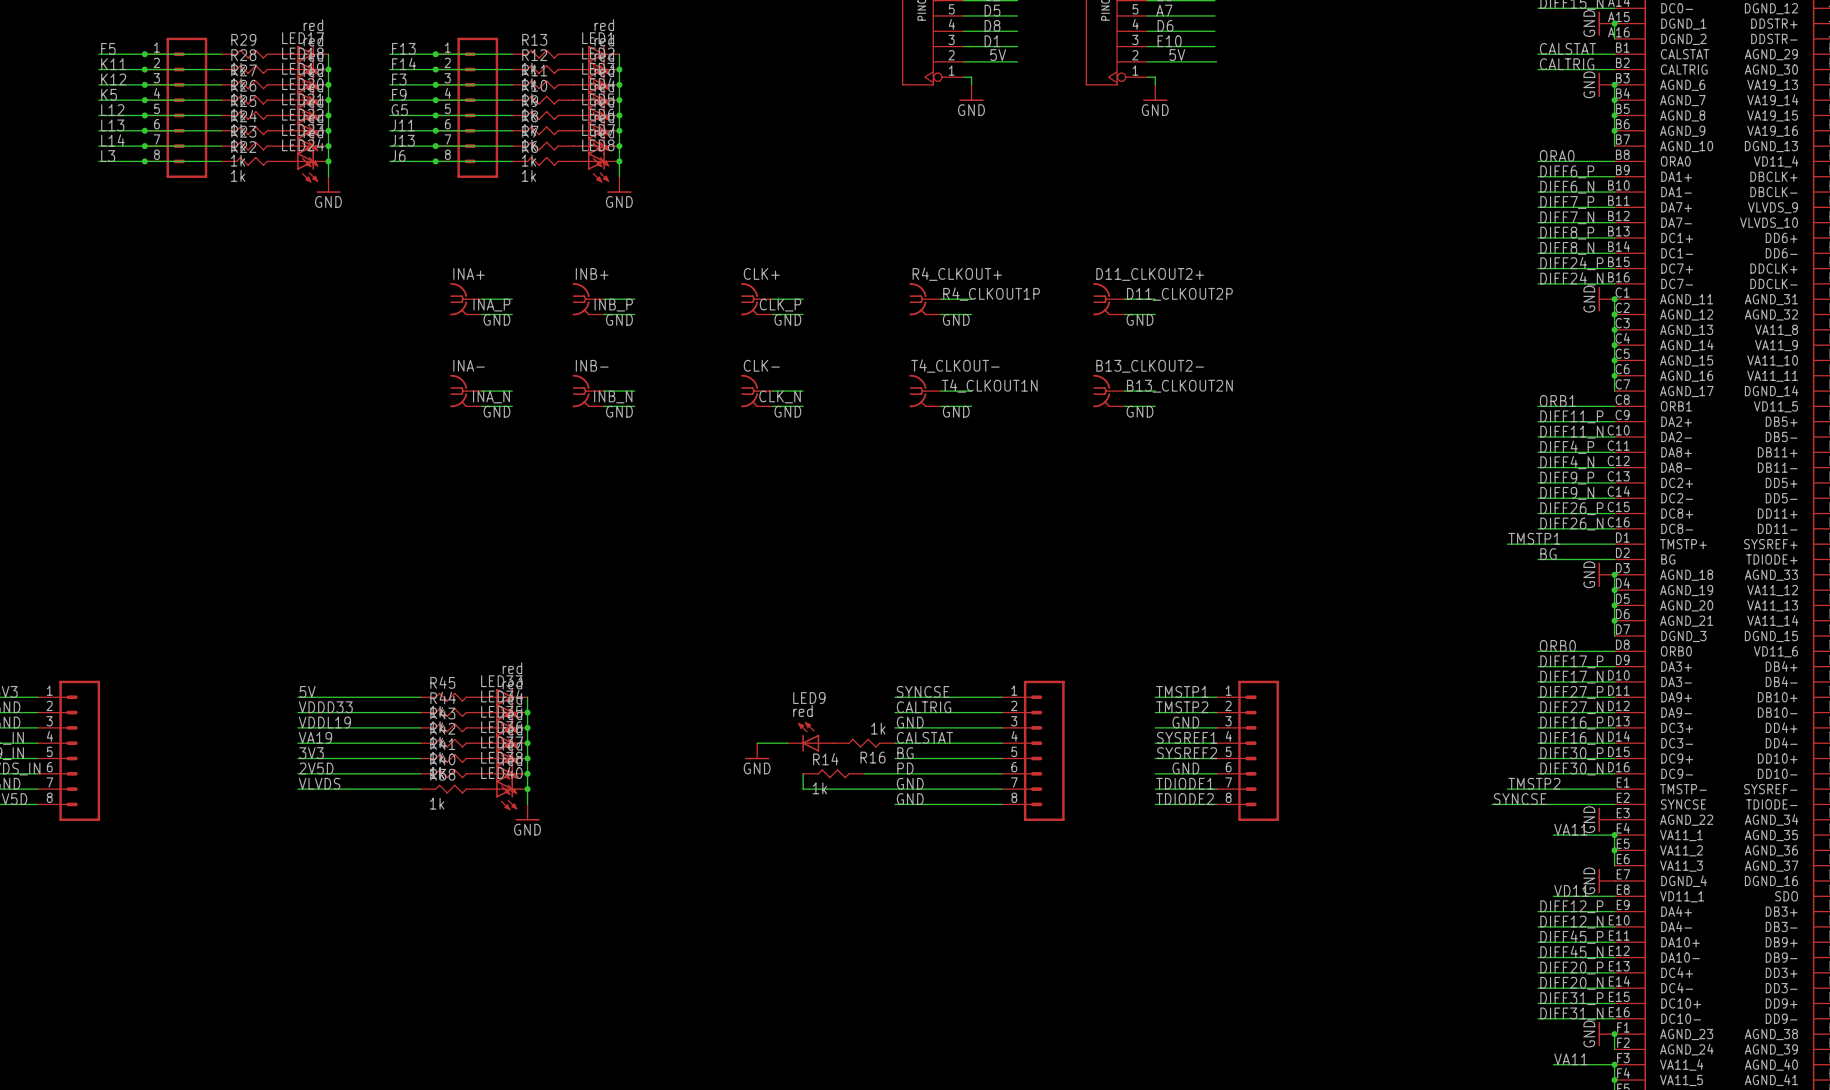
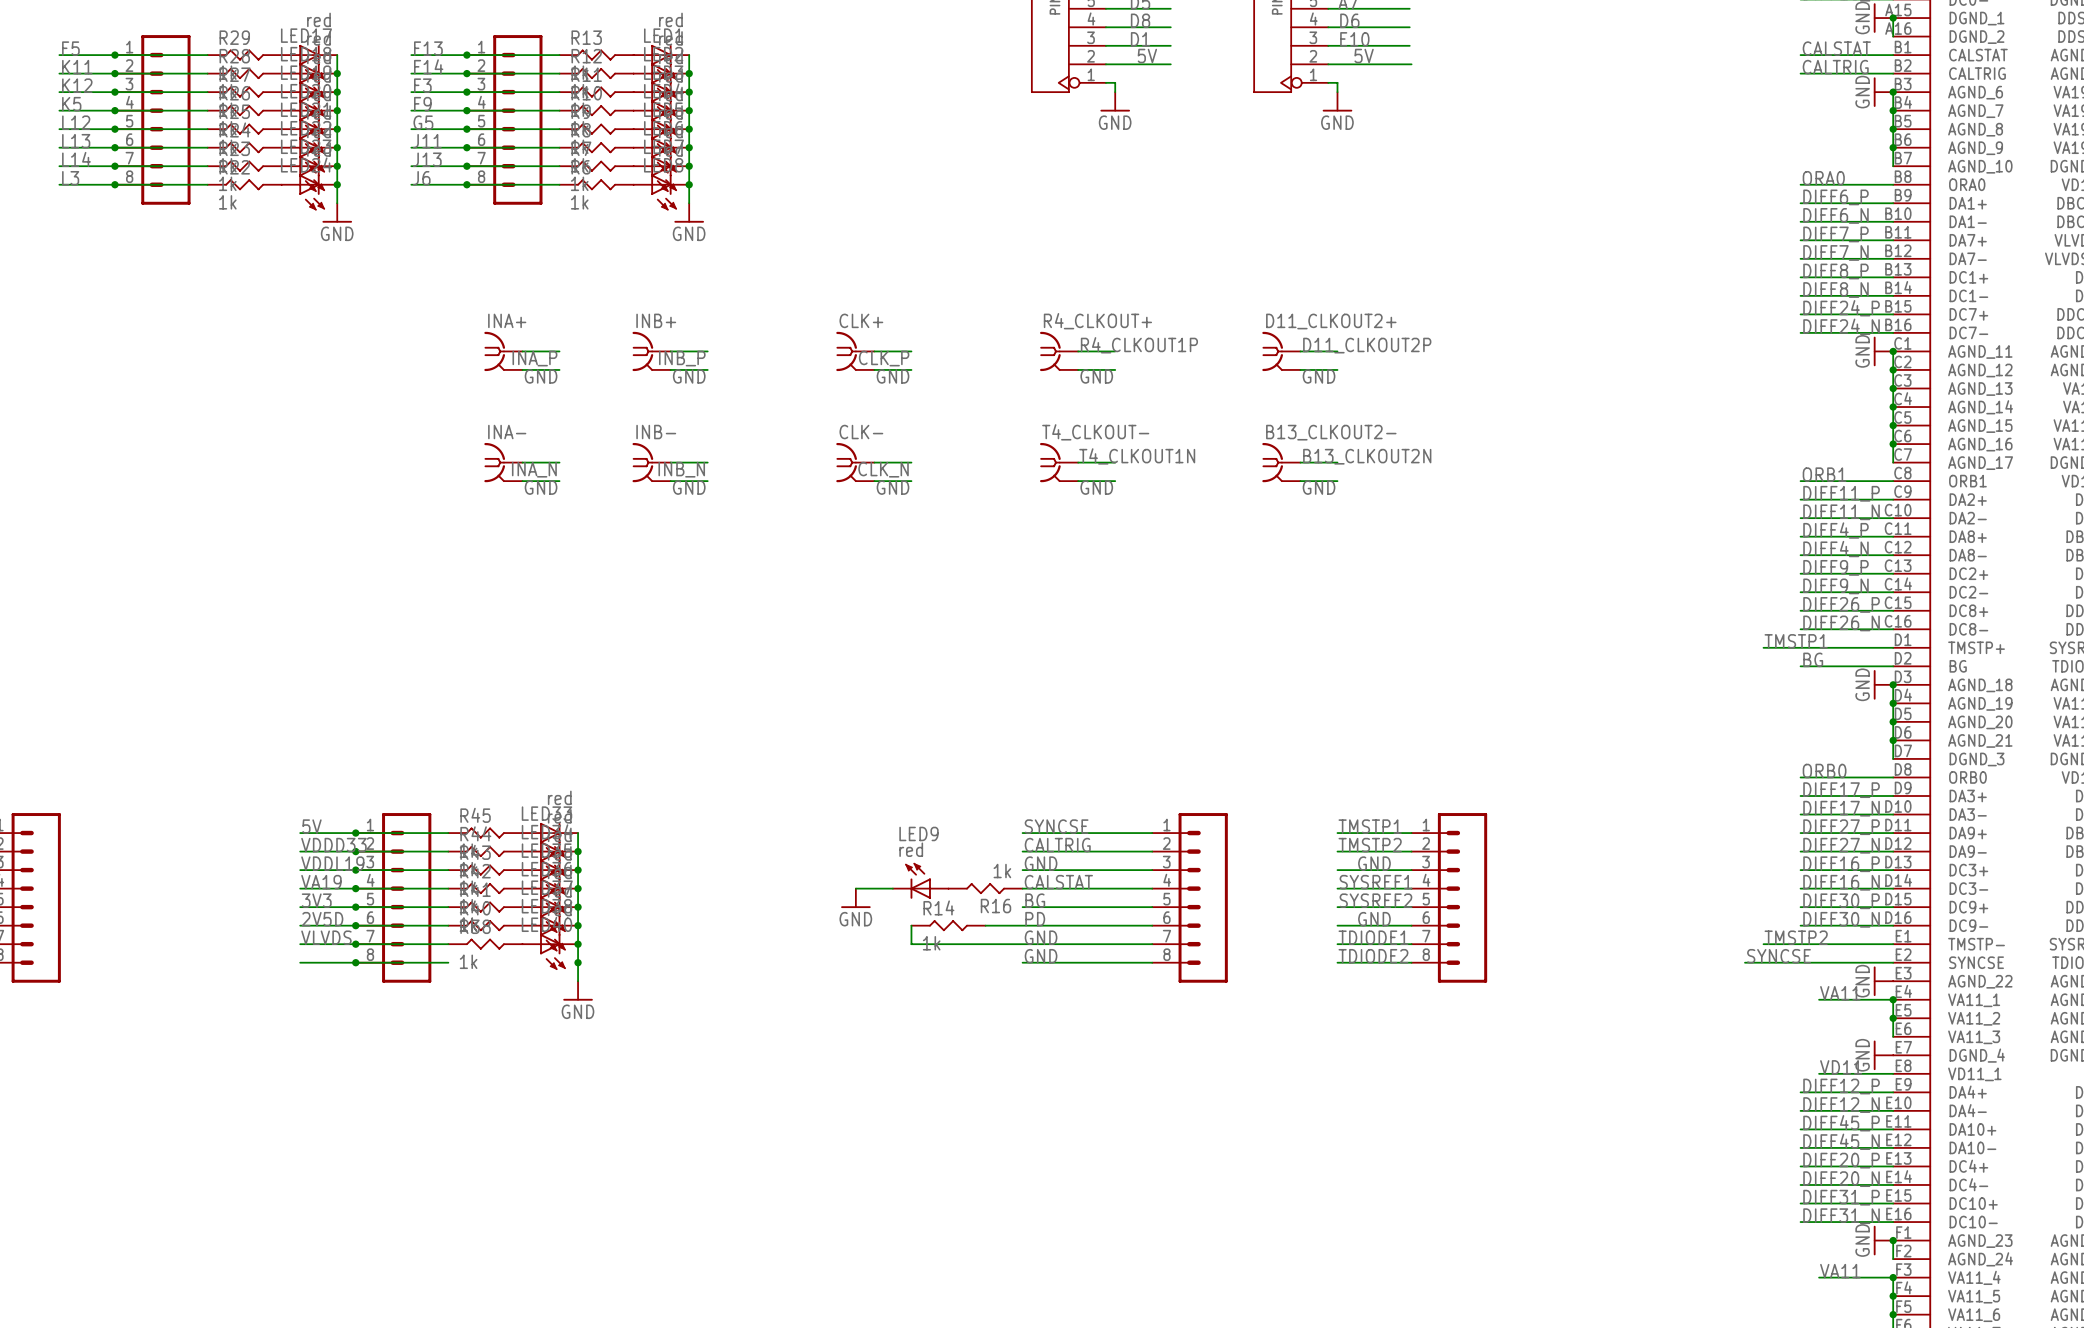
junction: none -> (355, 833)
junction: none -> (355, 851)
junction: none -> (355, 870)
junction: none -> (355, 888)
part: none -> (393, 897)
junction: none -> (355, 907)
junction: none -> (355, 925)
junction: none -> (355, 944)
wire: none -> (300, 962) (448, 962)
junction: none -> (355, 962)
junction: none -> (578, 962)
power symbol position: GND (527, 812) -> GND (578, 990)

